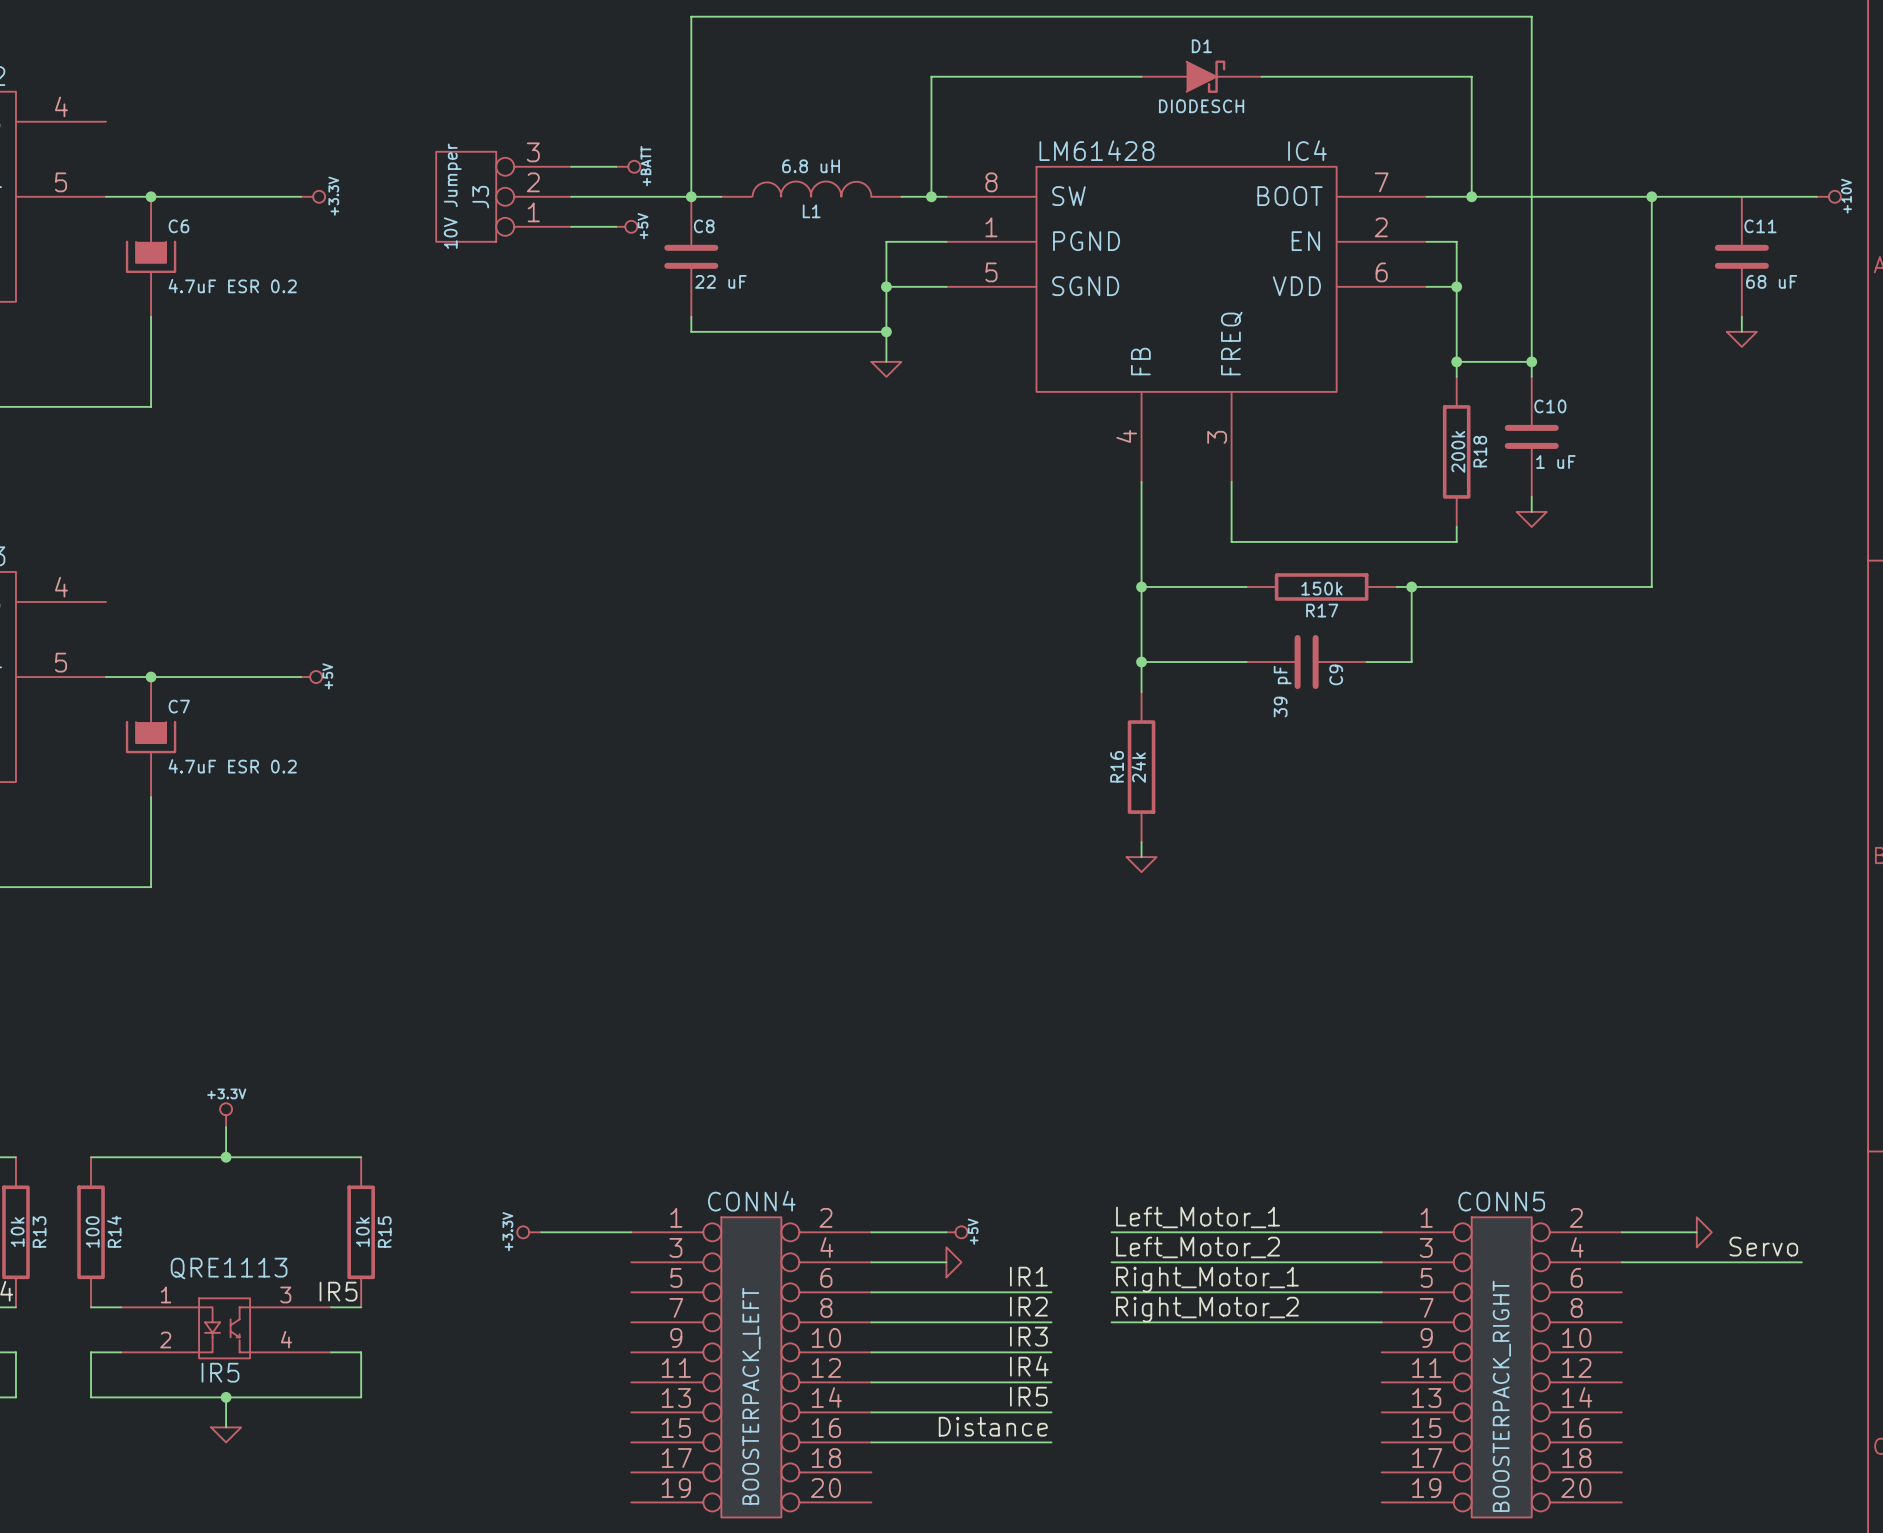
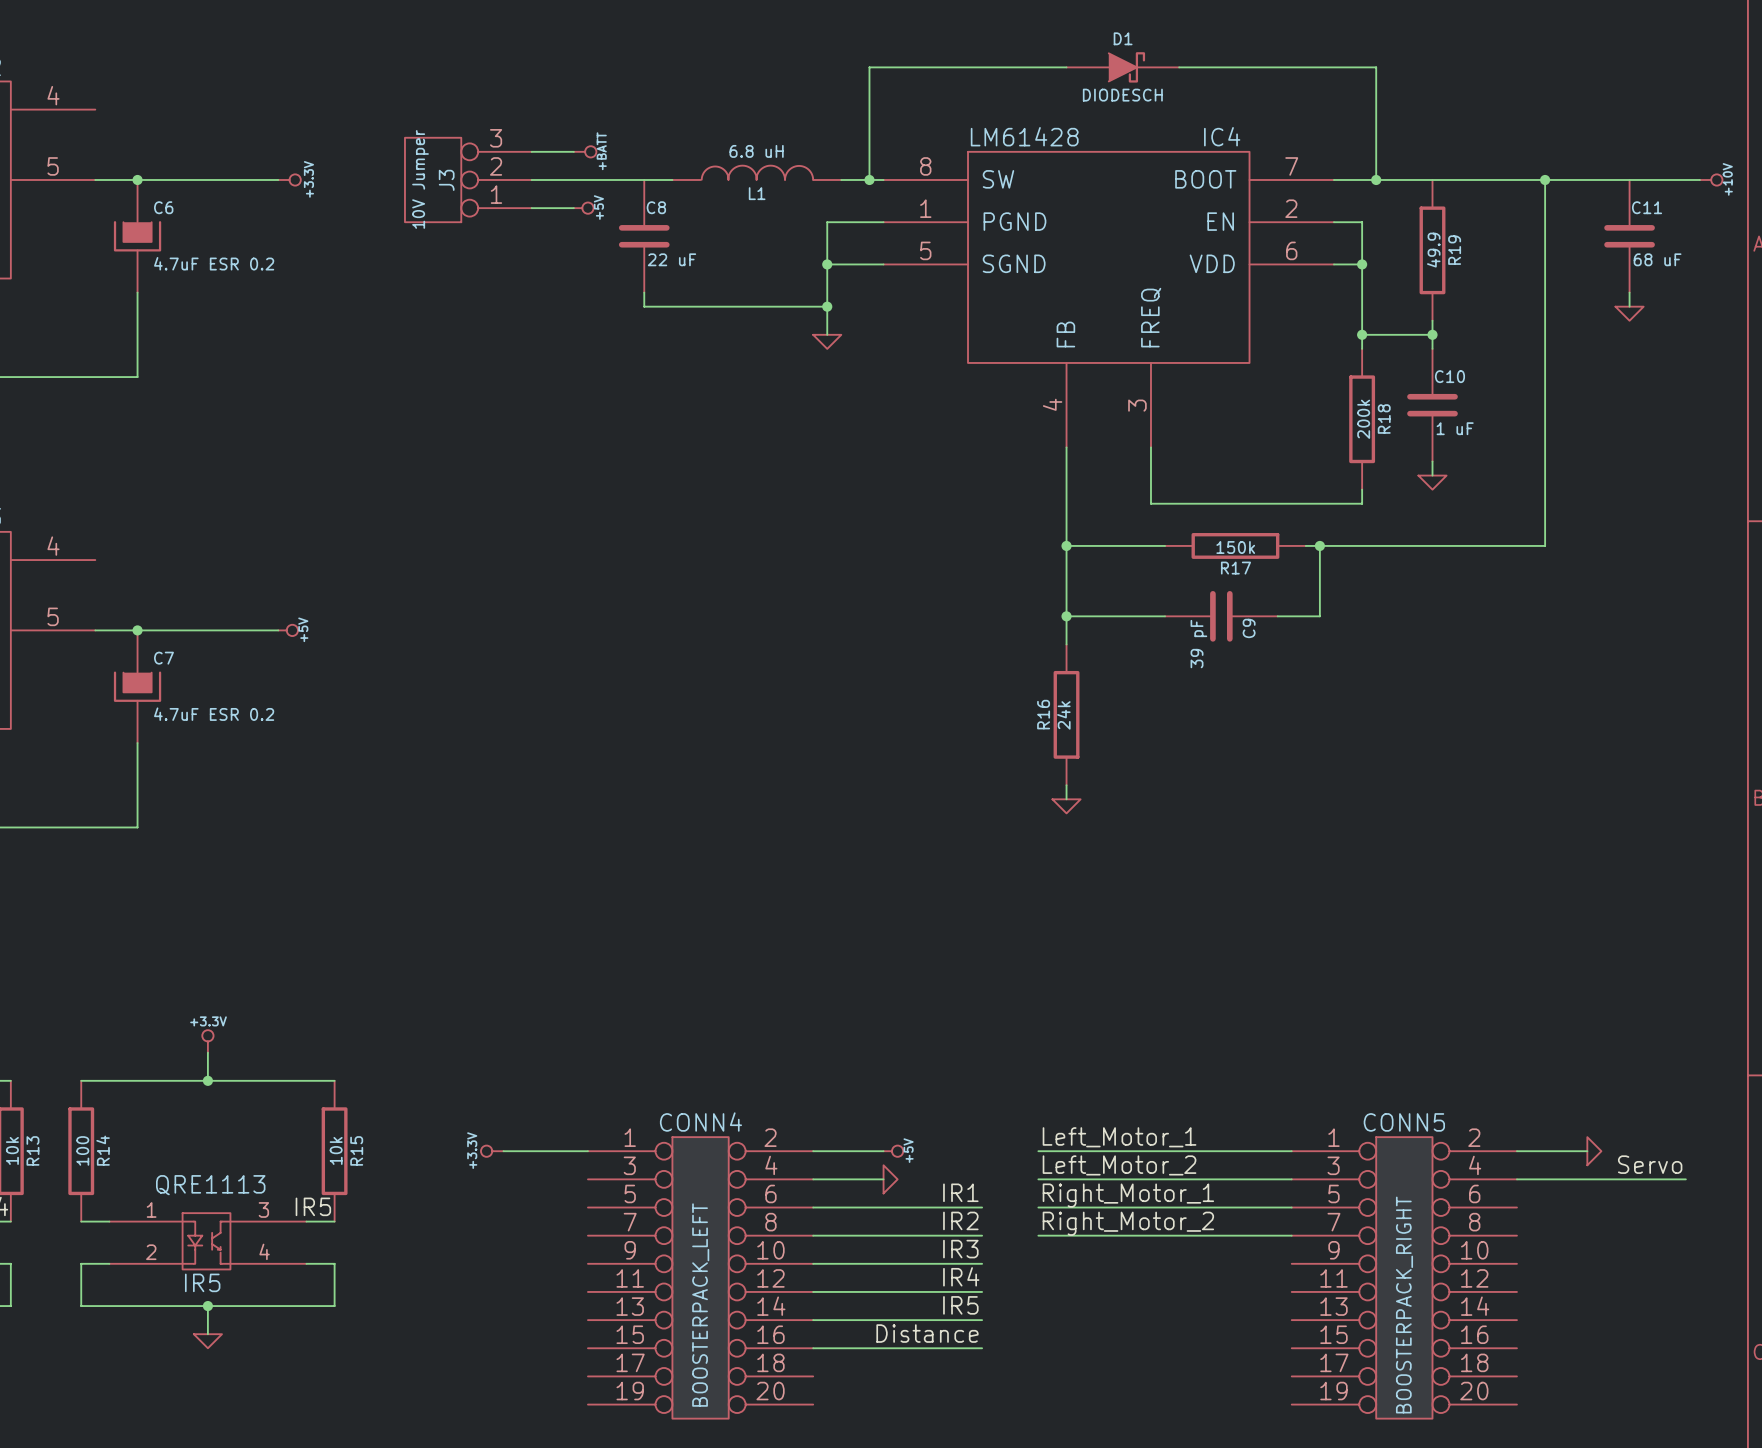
wire: (691, 196) (691, 16) (1531, 16) (1531, 346) -> none
junction: (691, 196) -> none
R19: none -> 49.9 (1432, 250)

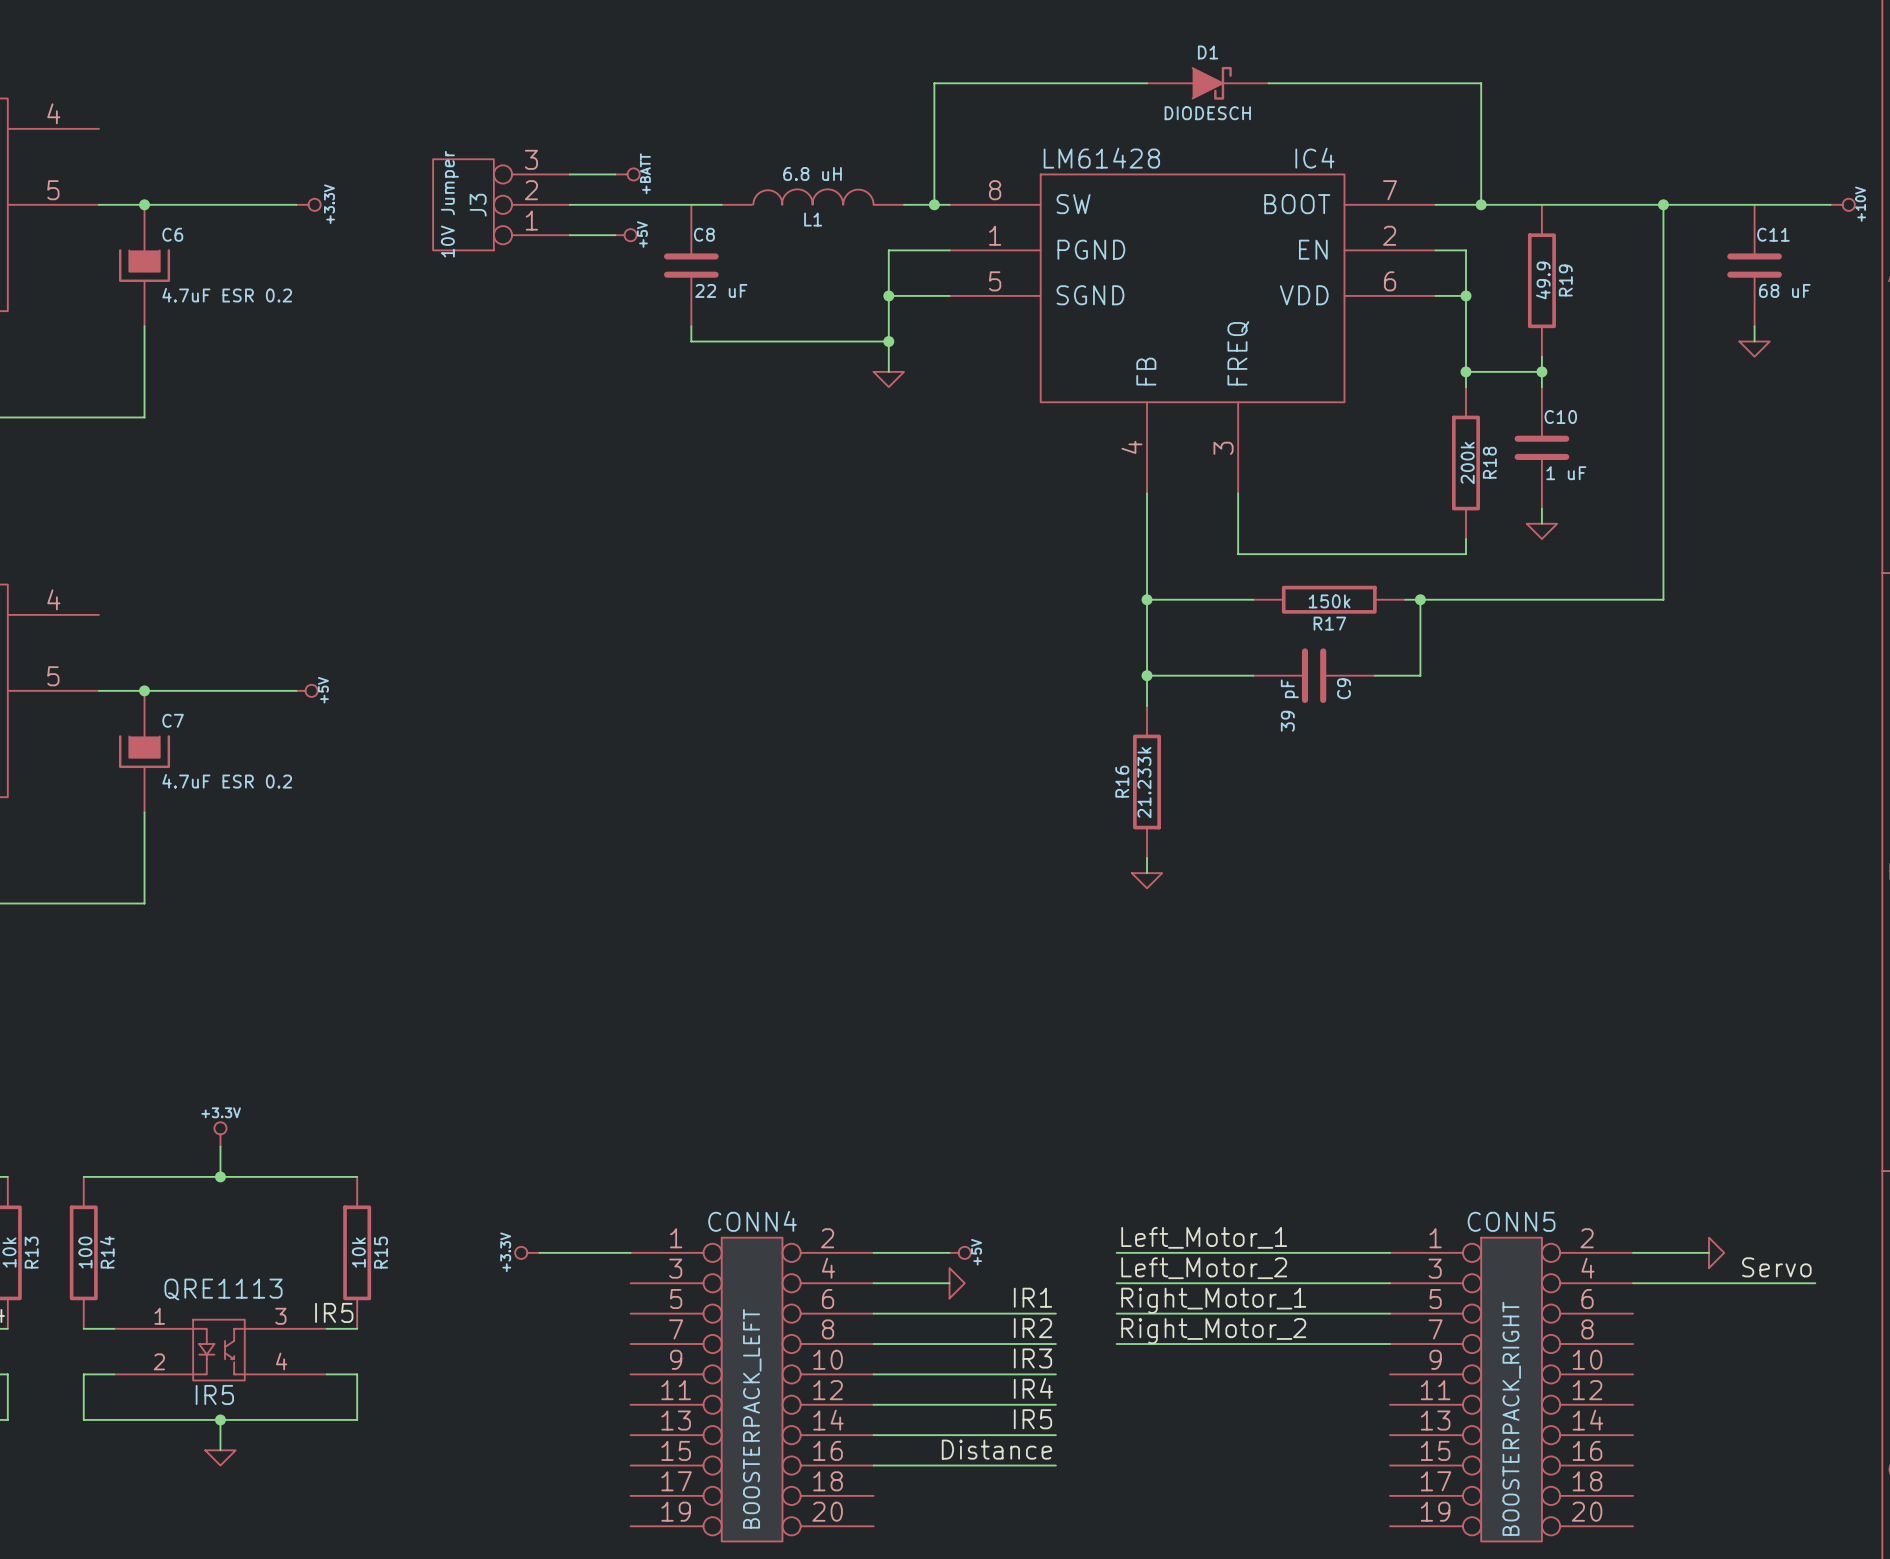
R16 value: 24k (1063, 715) -> 21.233k (1144, 782)

